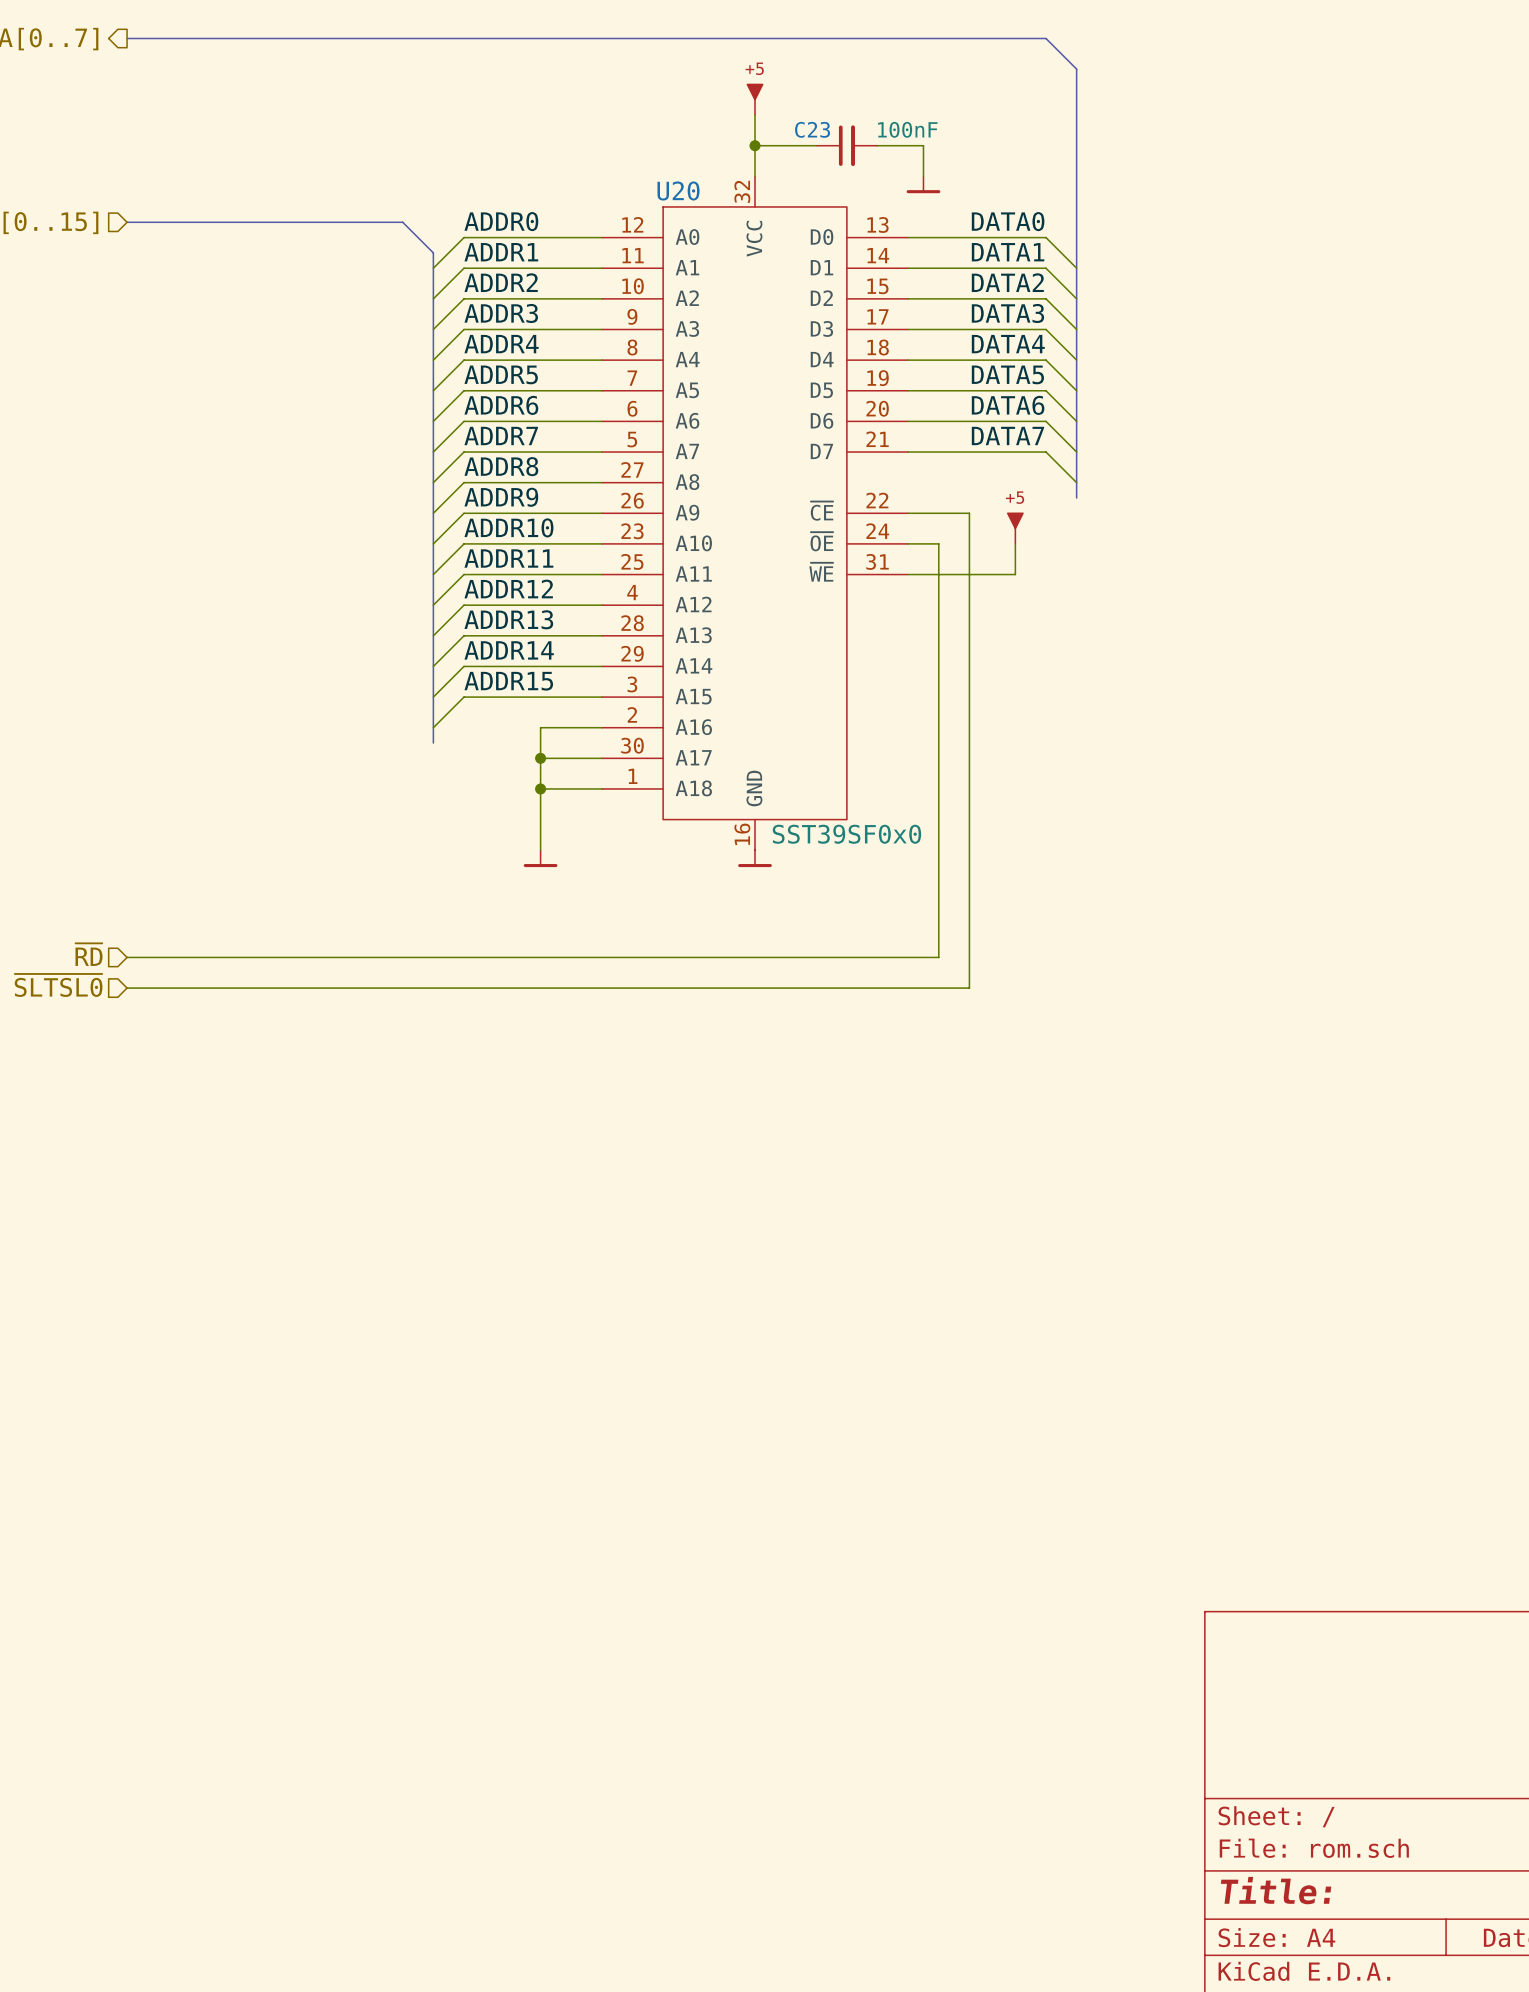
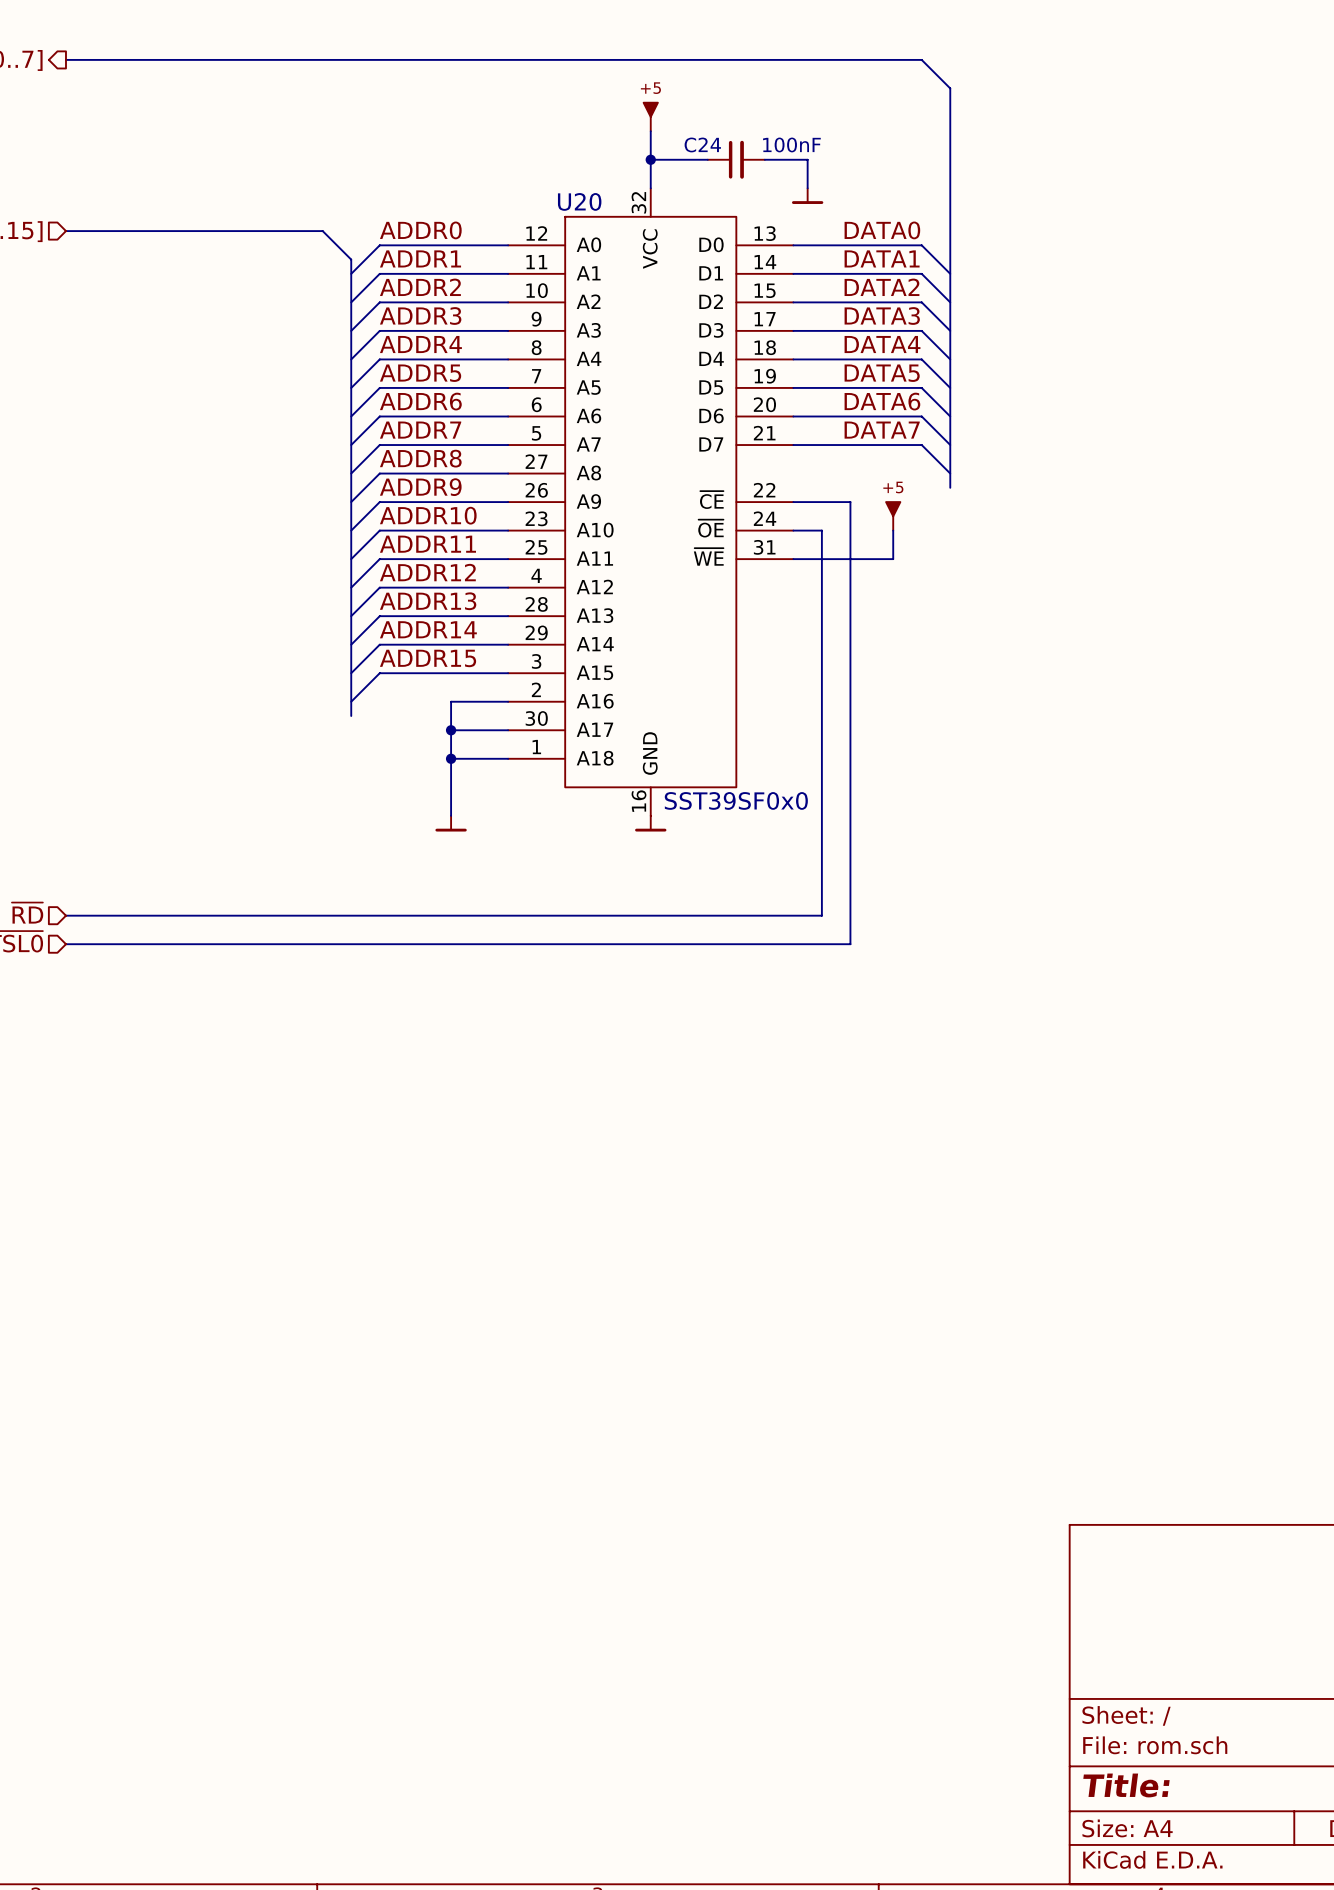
C23 name: C23 (812, 129) -> C24 (702, 144)

